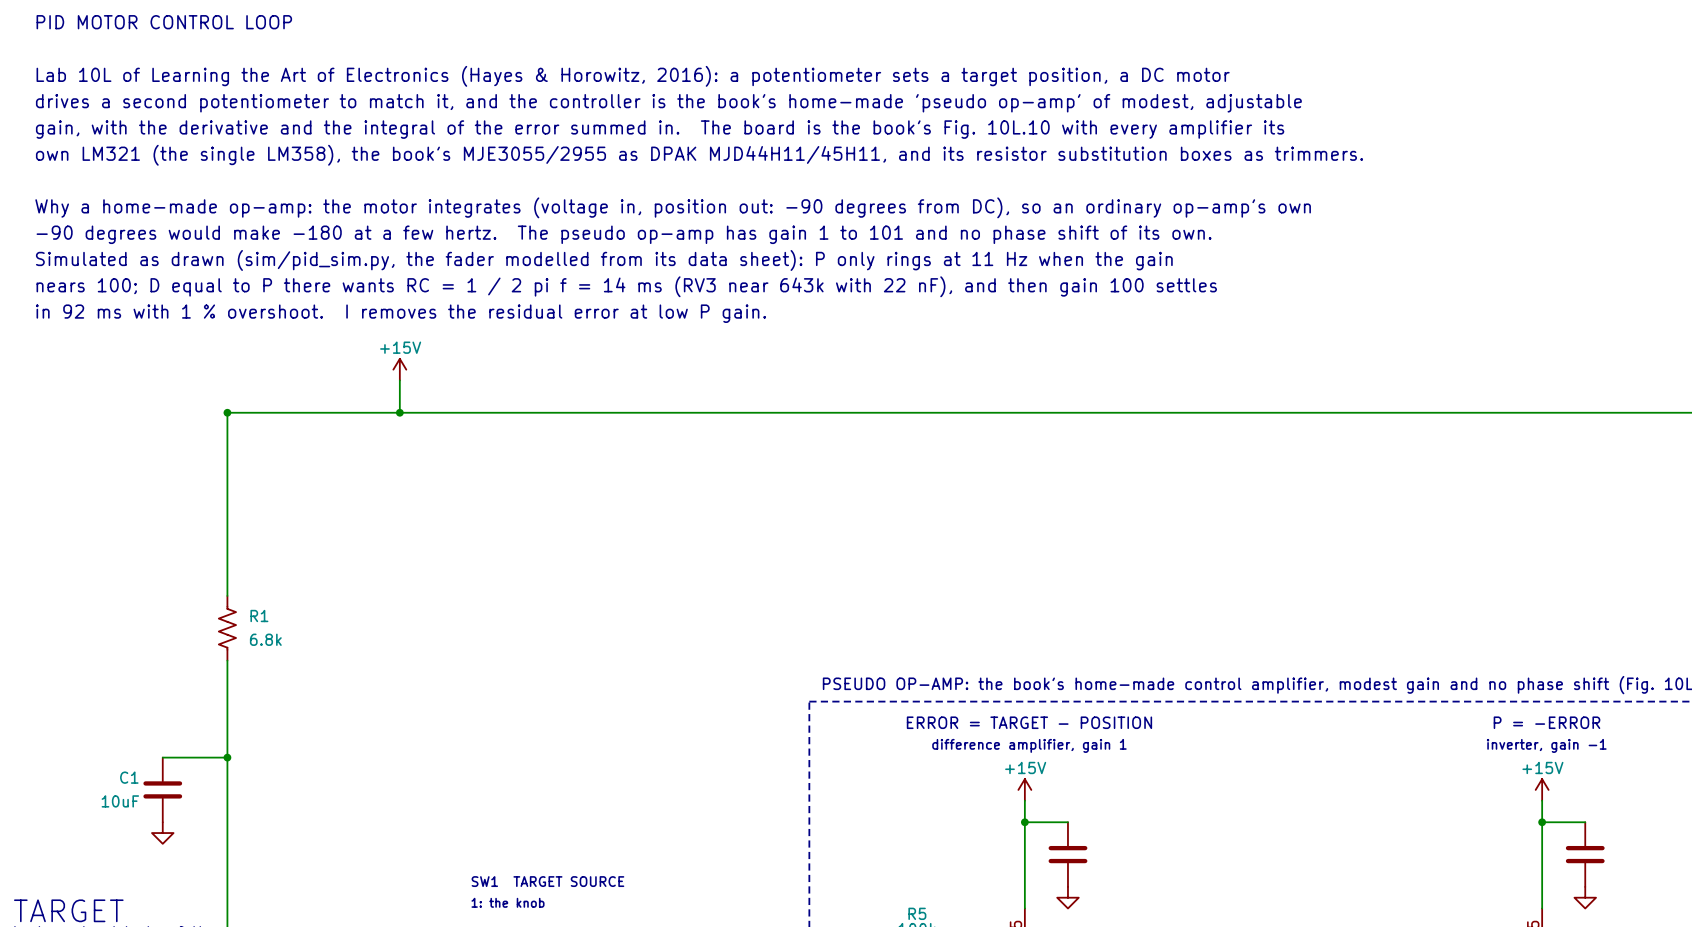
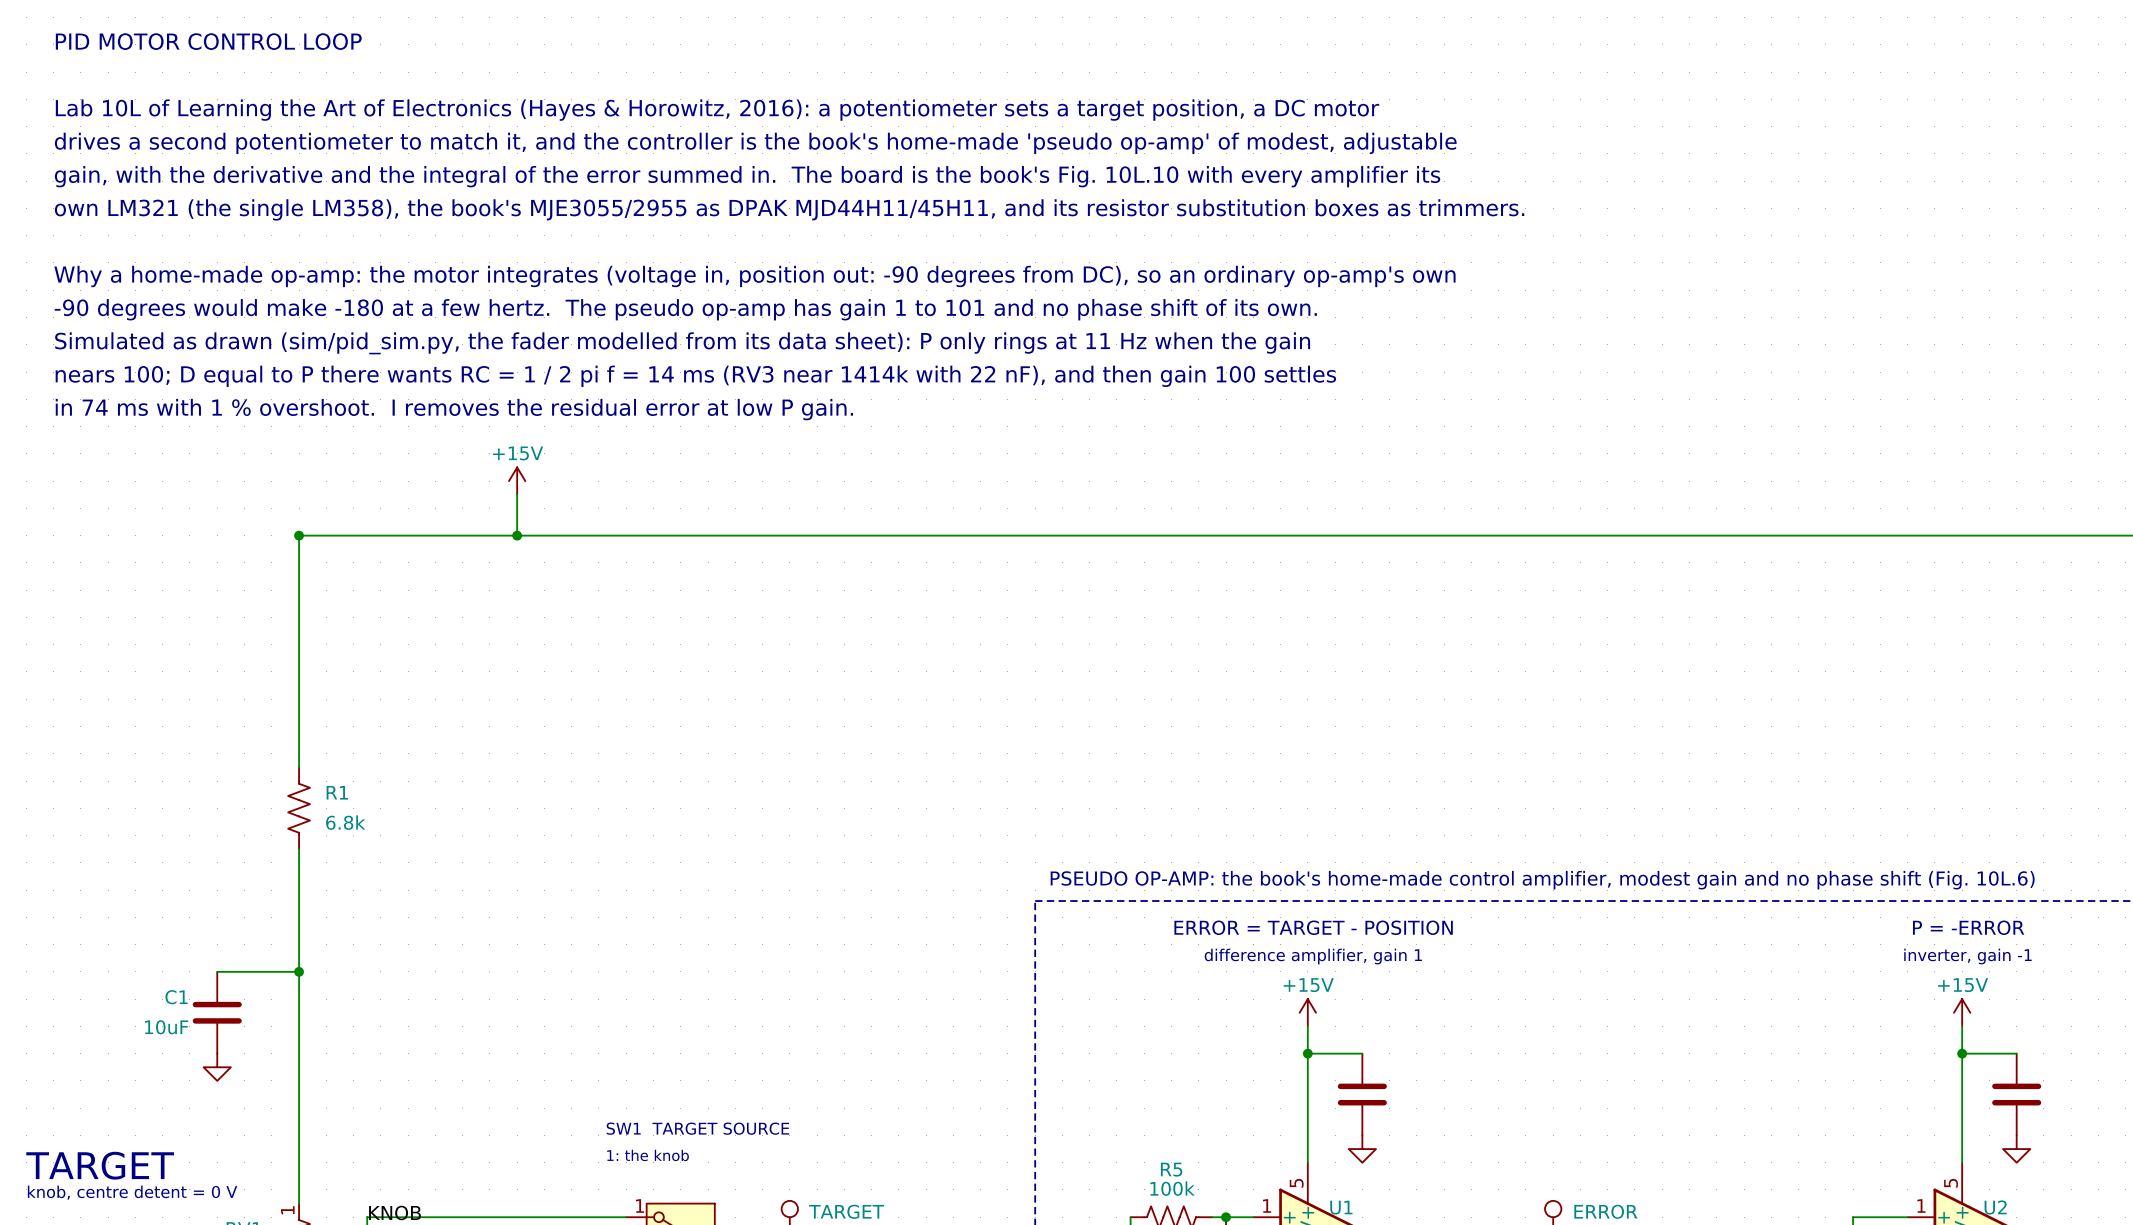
text: nears 100; D equal to P there wants RC = 1 / 2 pi f = 14 ms (RV3 near 643k with 22 nF), and then gain 100 settles (626, 286) -> nears 100; D equal to P there wants RC = 1 / 2 pi f = 14 ms (RV3 near 1414k with 22 nF), and then gain 100 settles (695, 376)
text: in 92 ms with 1 % overshoot. I removes the residual error at low P gain. (400, 313) -> in 74 ms with 1 % overshoot. I removes the residual error at low P gain. (454, 409)

